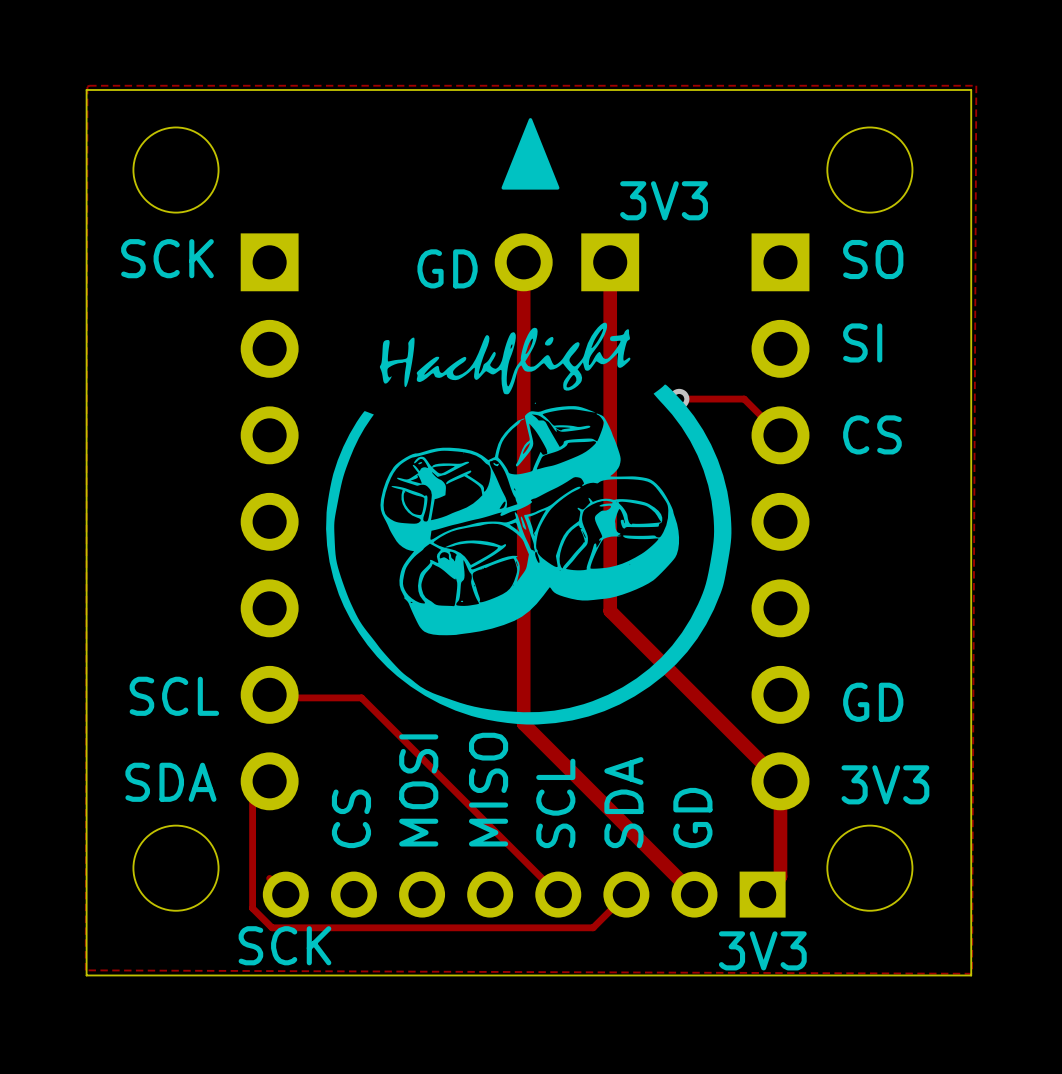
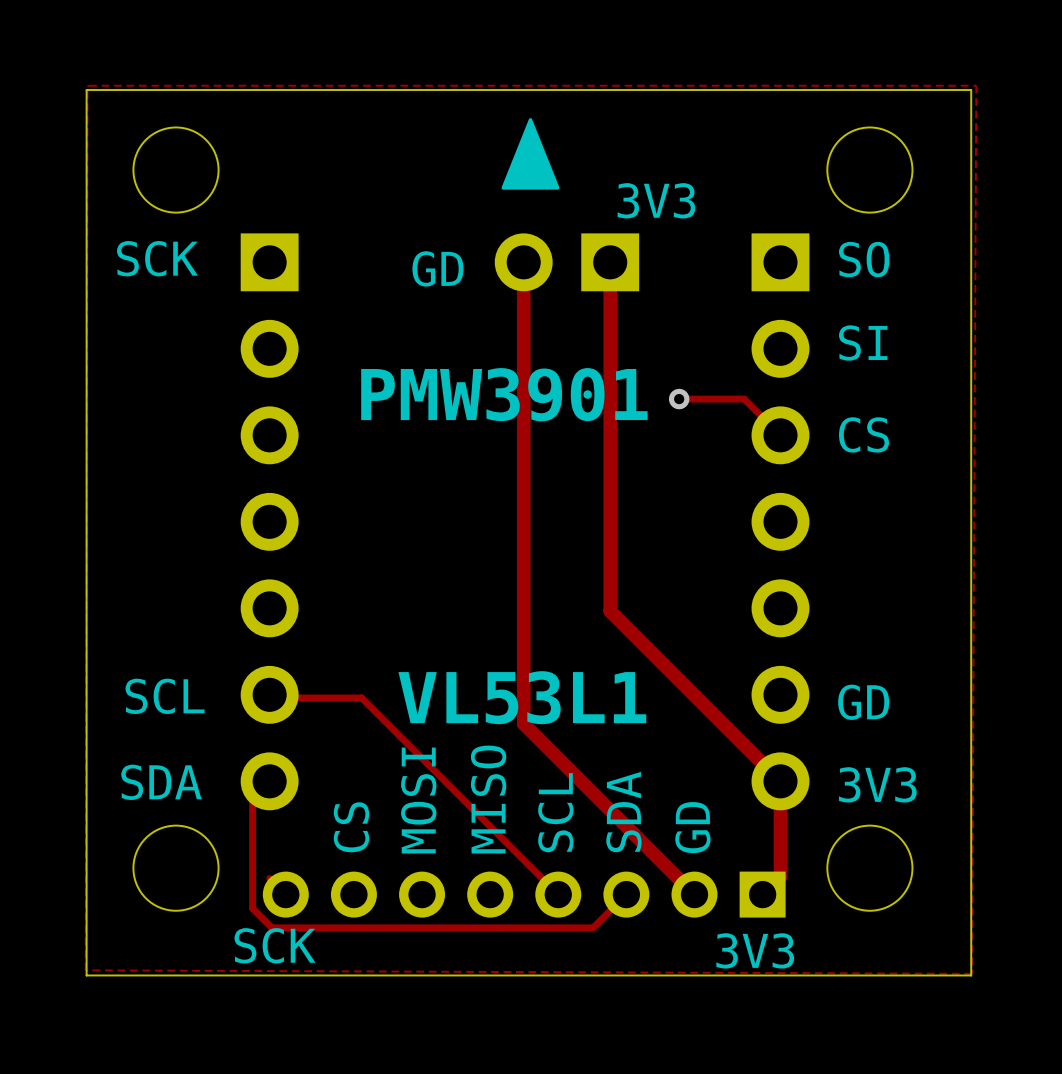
drawing: [326, 322, 732, 725] -> none
text: none -> PMW3901 (504, 394)
text: none -> VL53L1 (522, 697)

